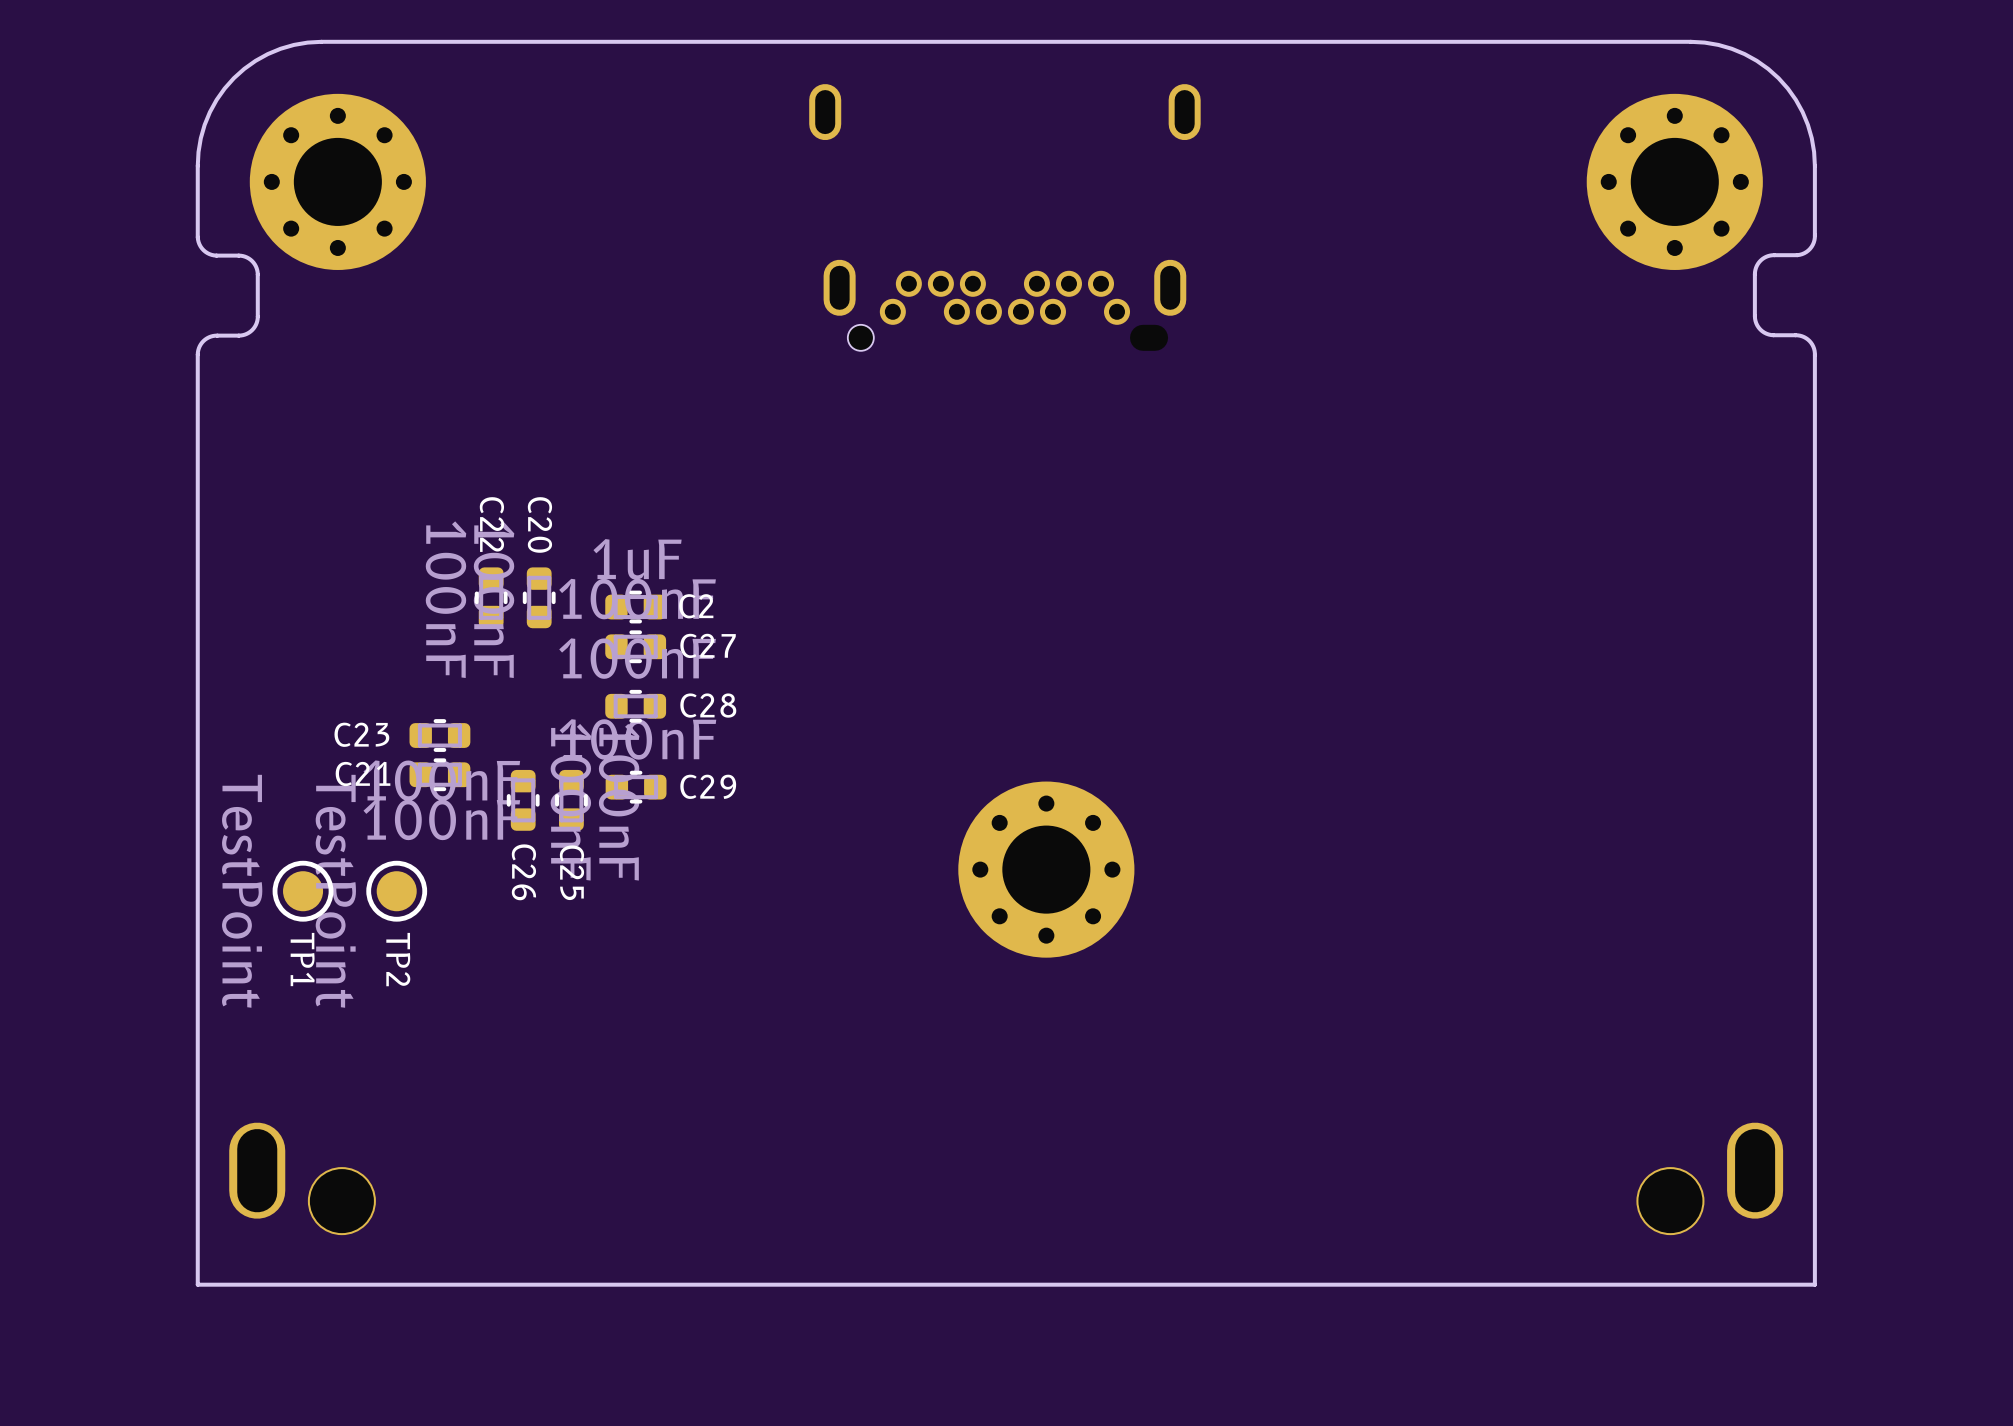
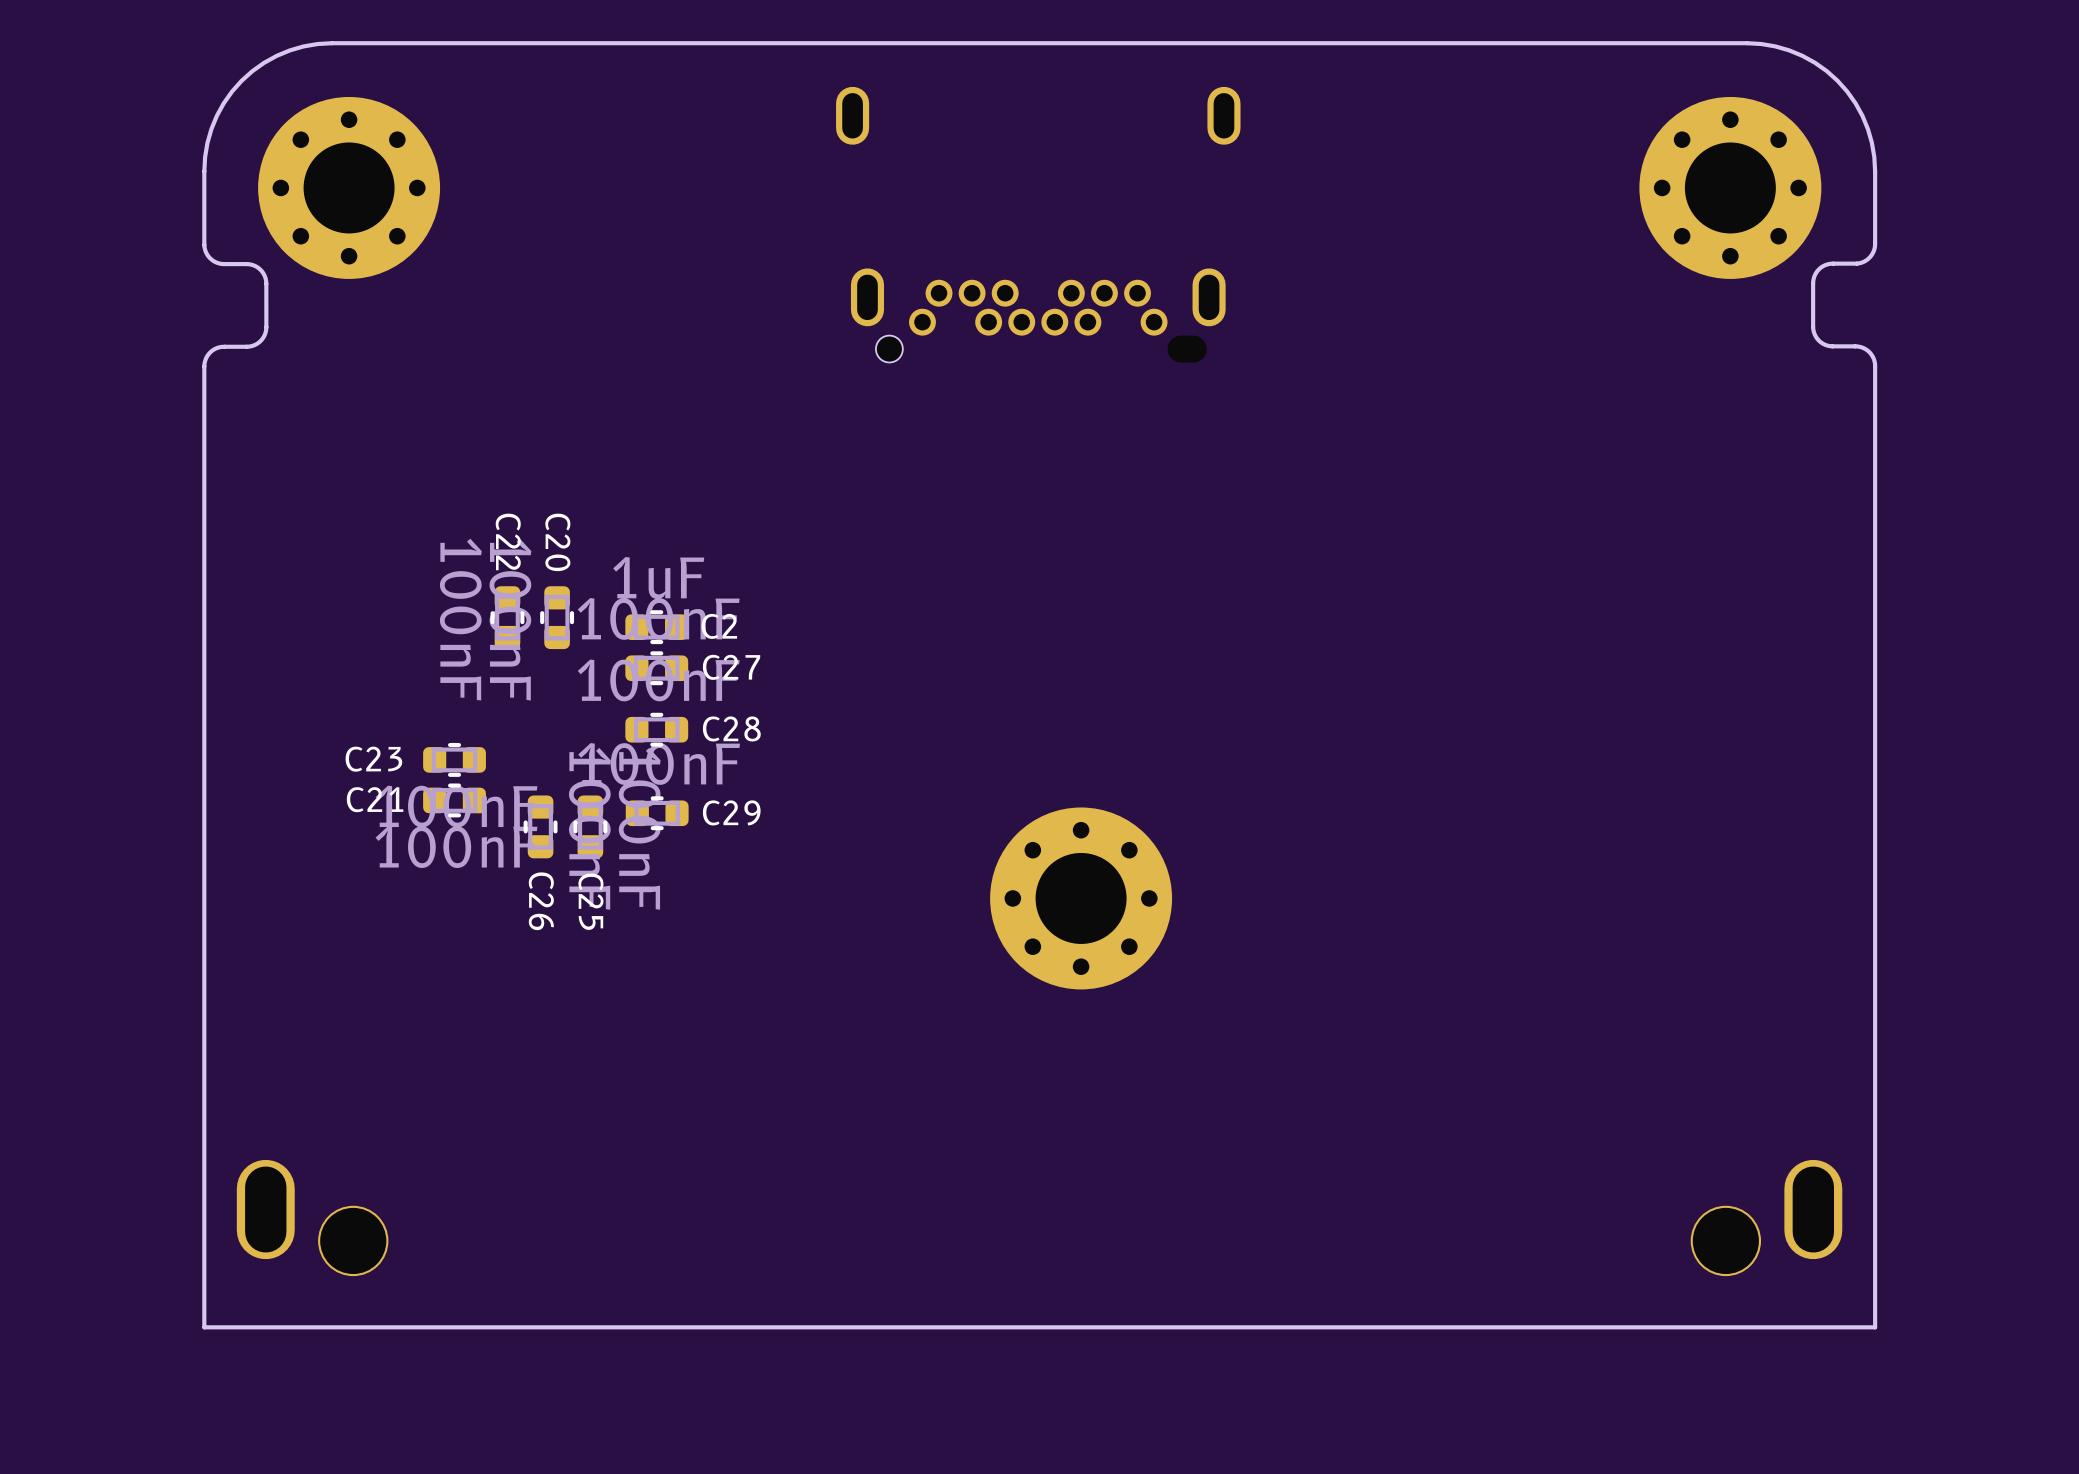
TP1: TestPoint (303, 891) -> none
TP2: TestPoint (396, 891) -> none

